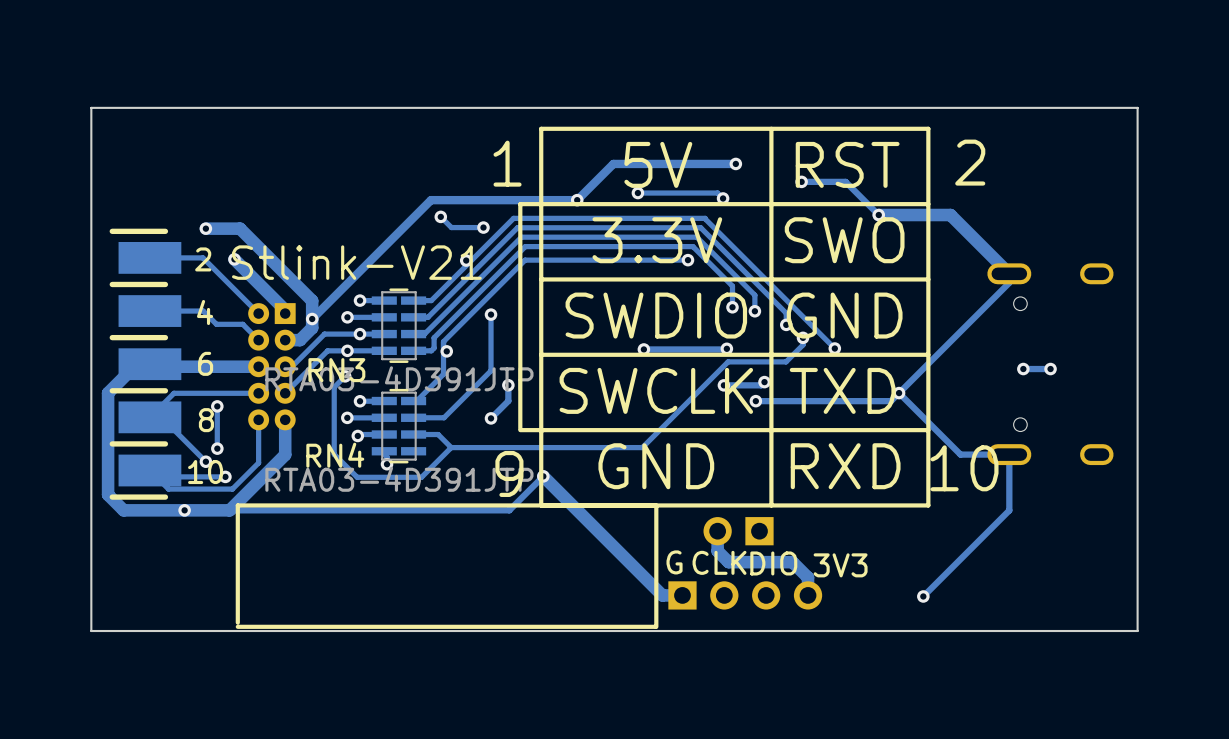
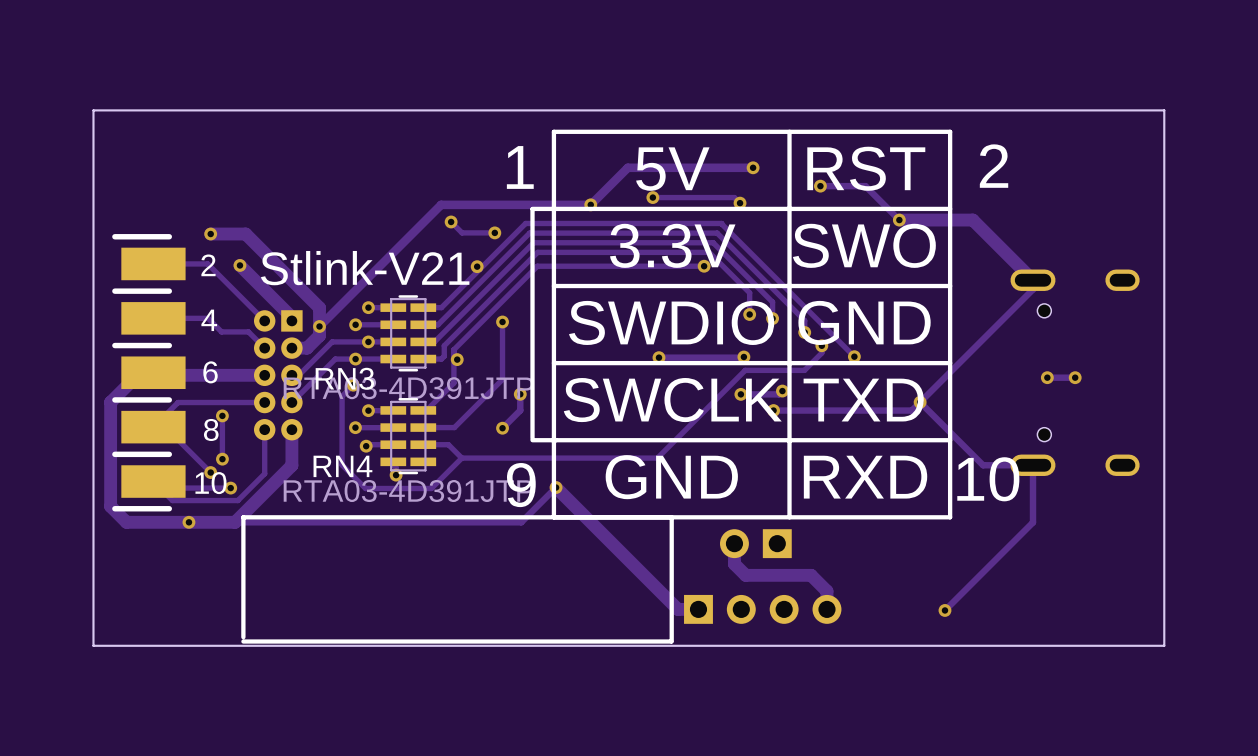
text: G (674, 562) -> none
text: CLK (719, 562) -> none
text: DIO (773, 563) -> none
text: 3V3 (840, 565) -> none

